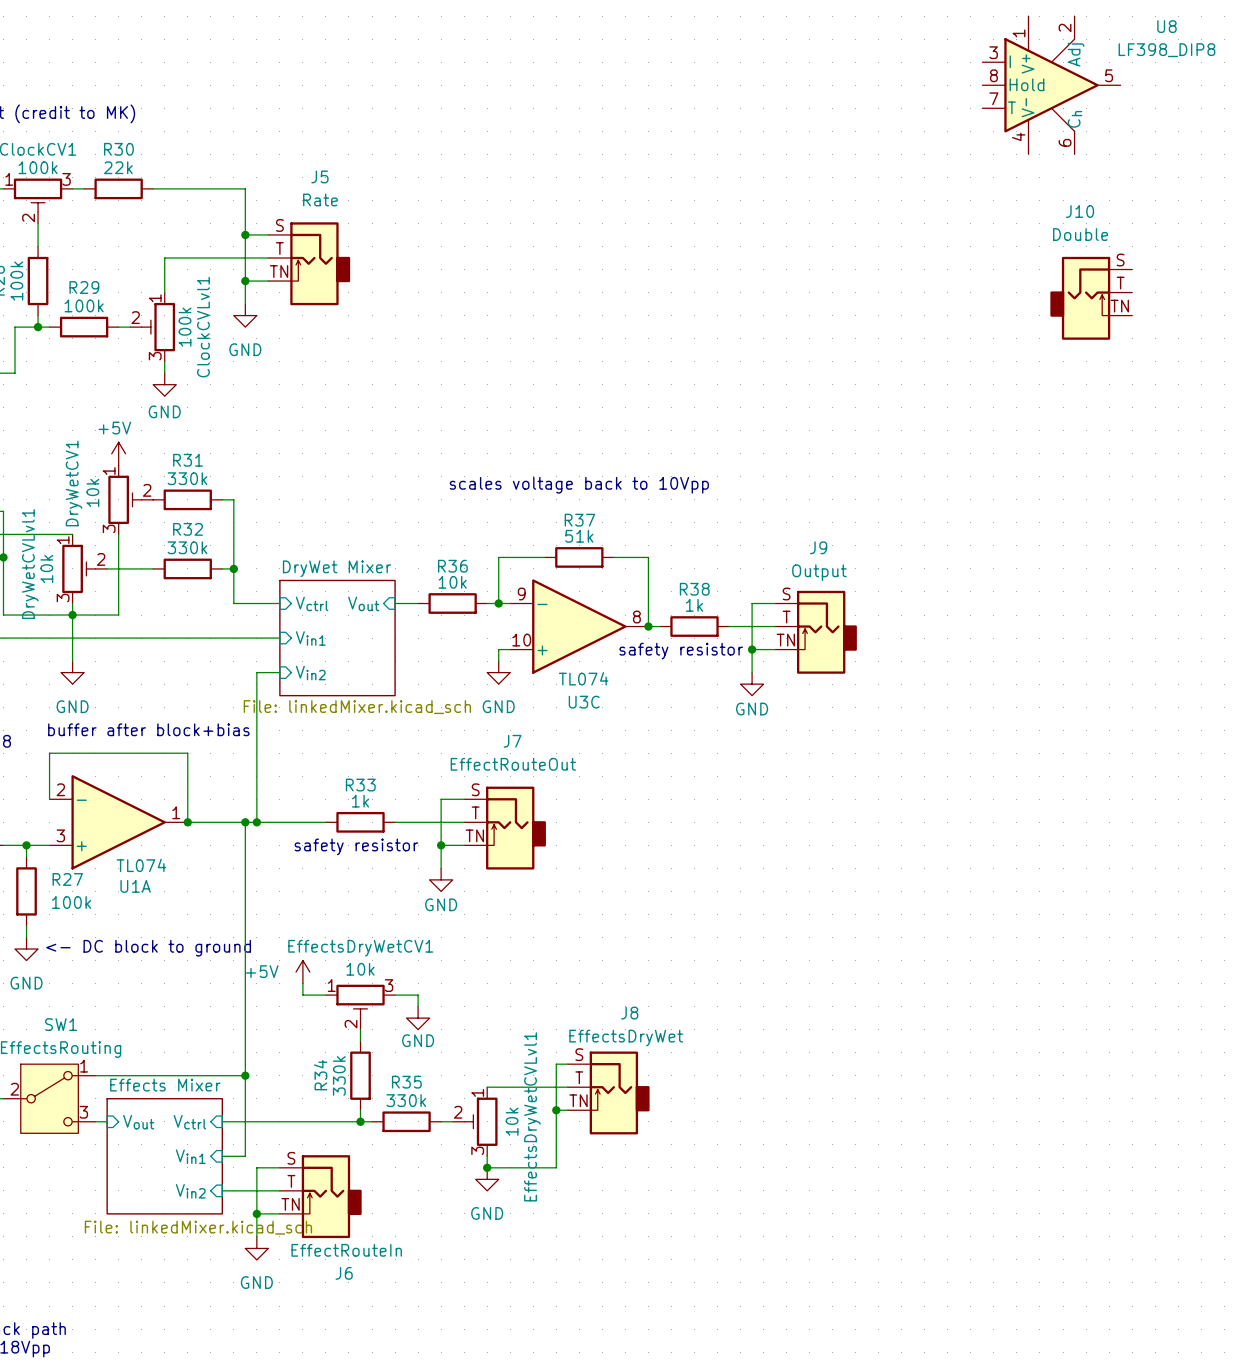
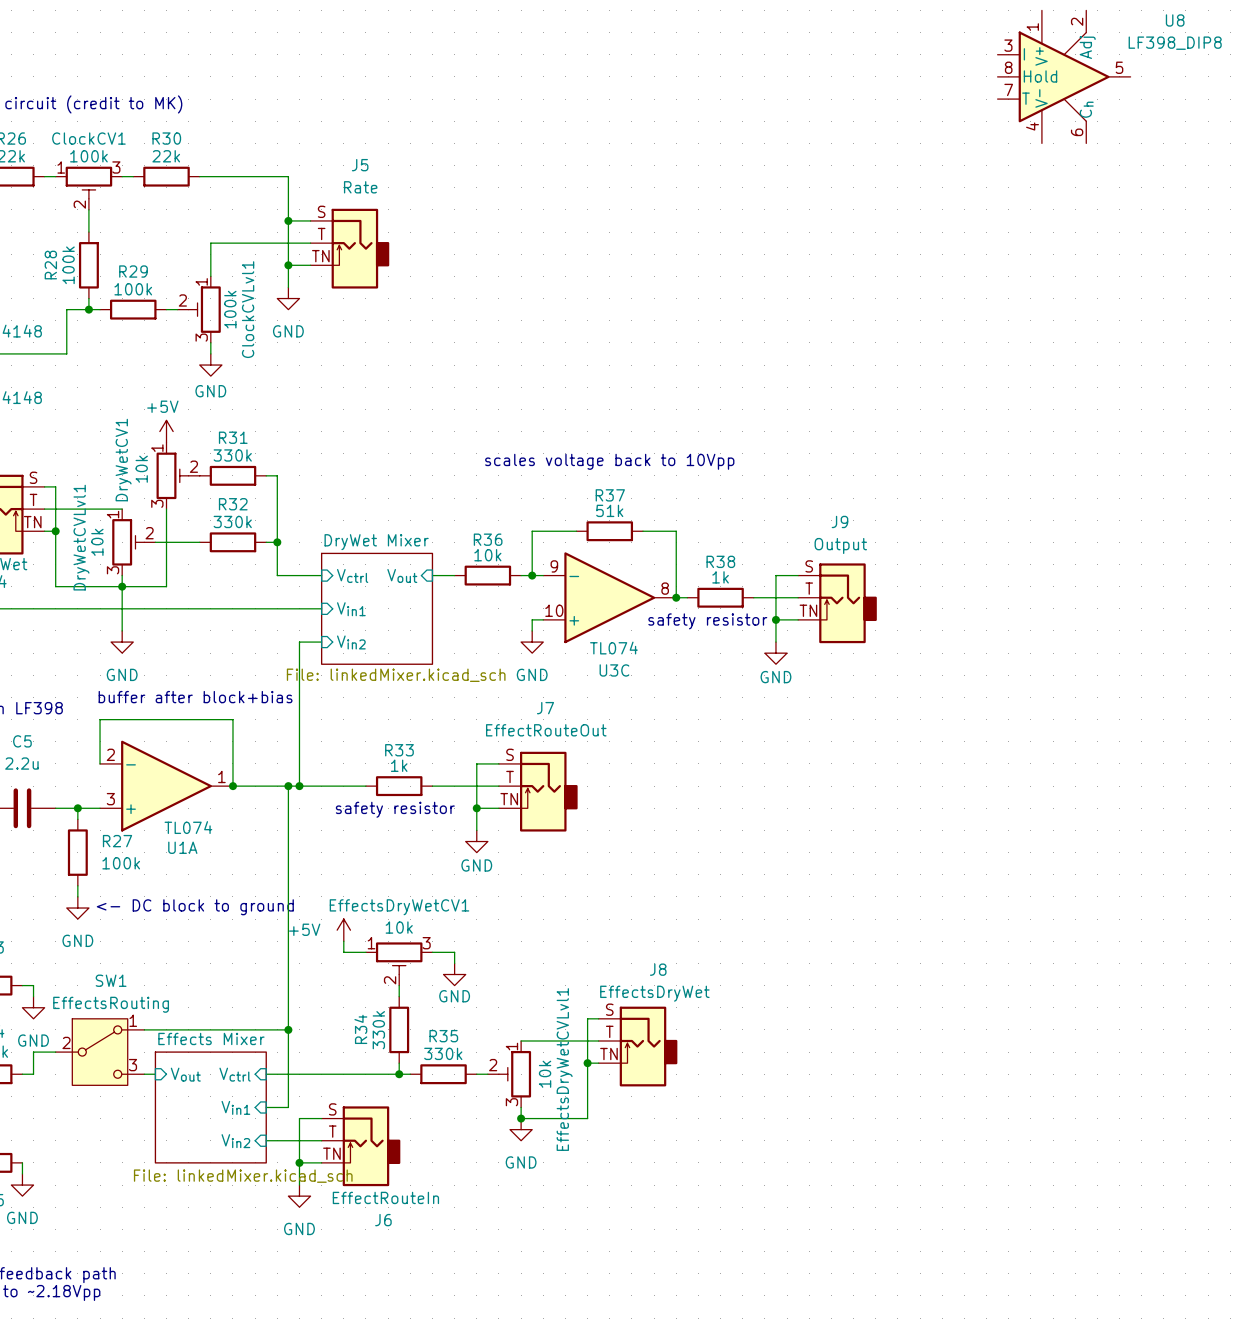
J10: Double (1091, 298) -> none

